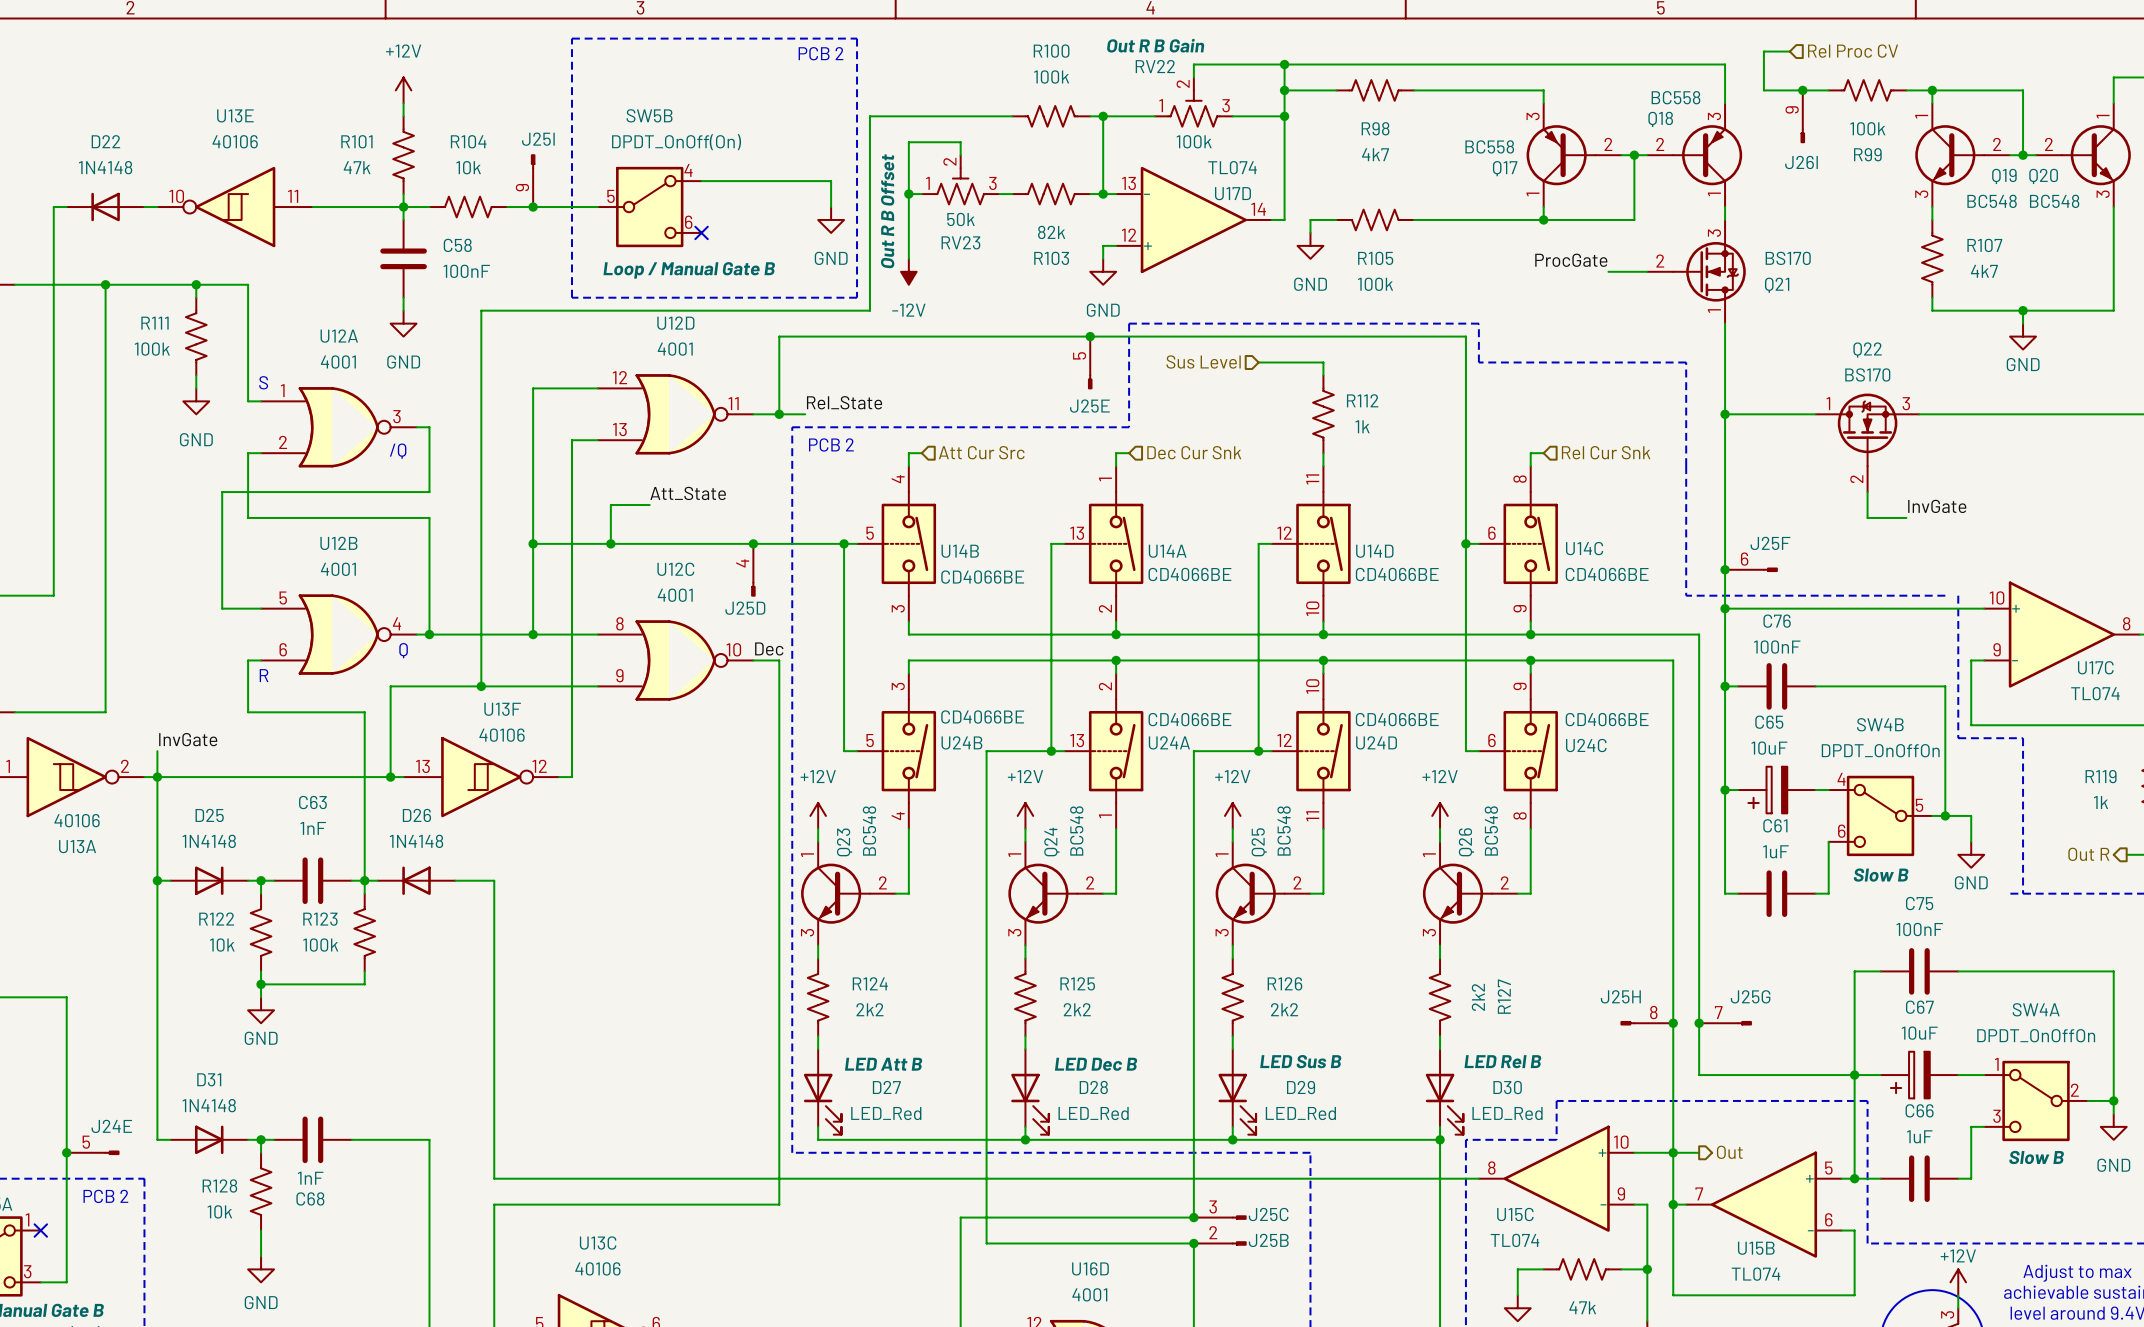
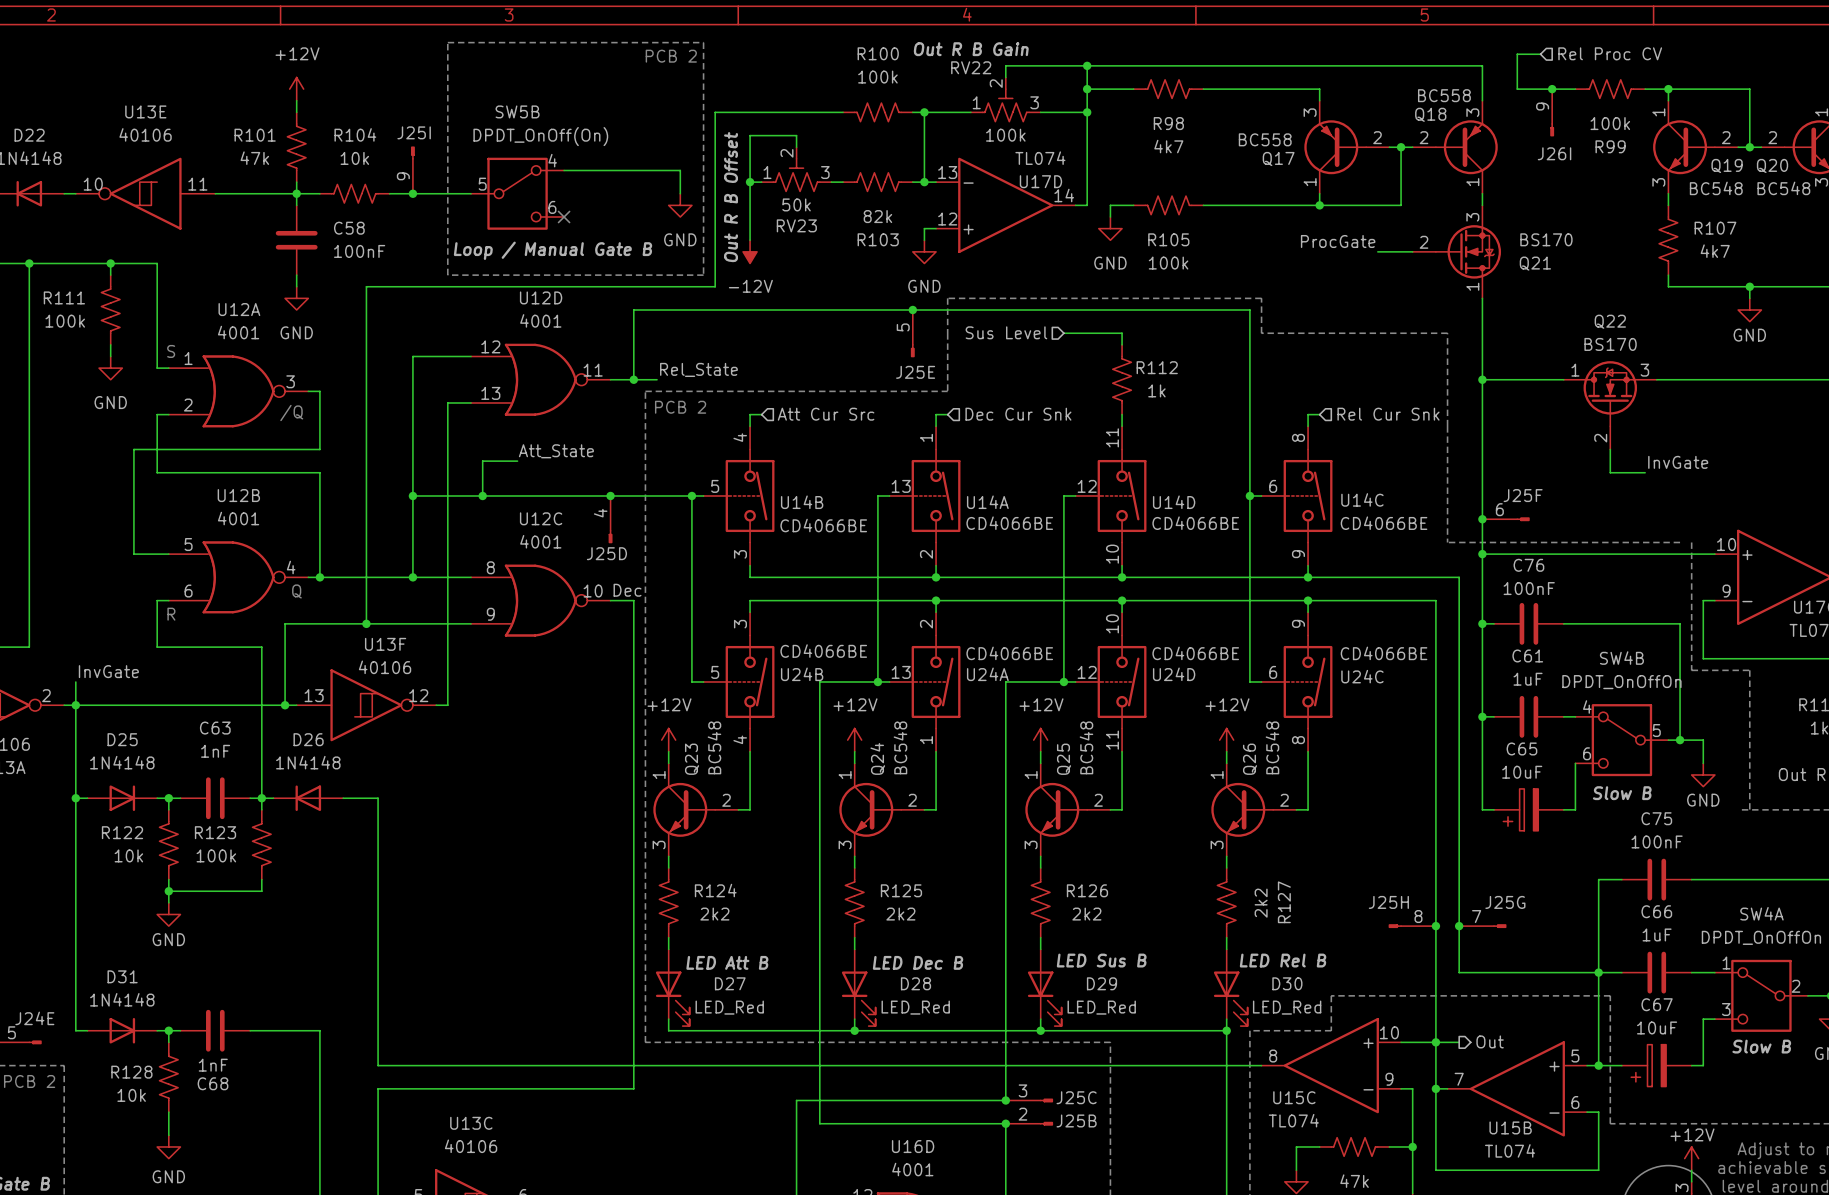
C65 position: (1776, 790) -> (1528, 809)
C61 position: (1776, 893) -> (1528, 716)
C67 position: (1919, 1075) -> (1656, 1065)
C66 position: (1919, 1178) -> (1656, 972)

